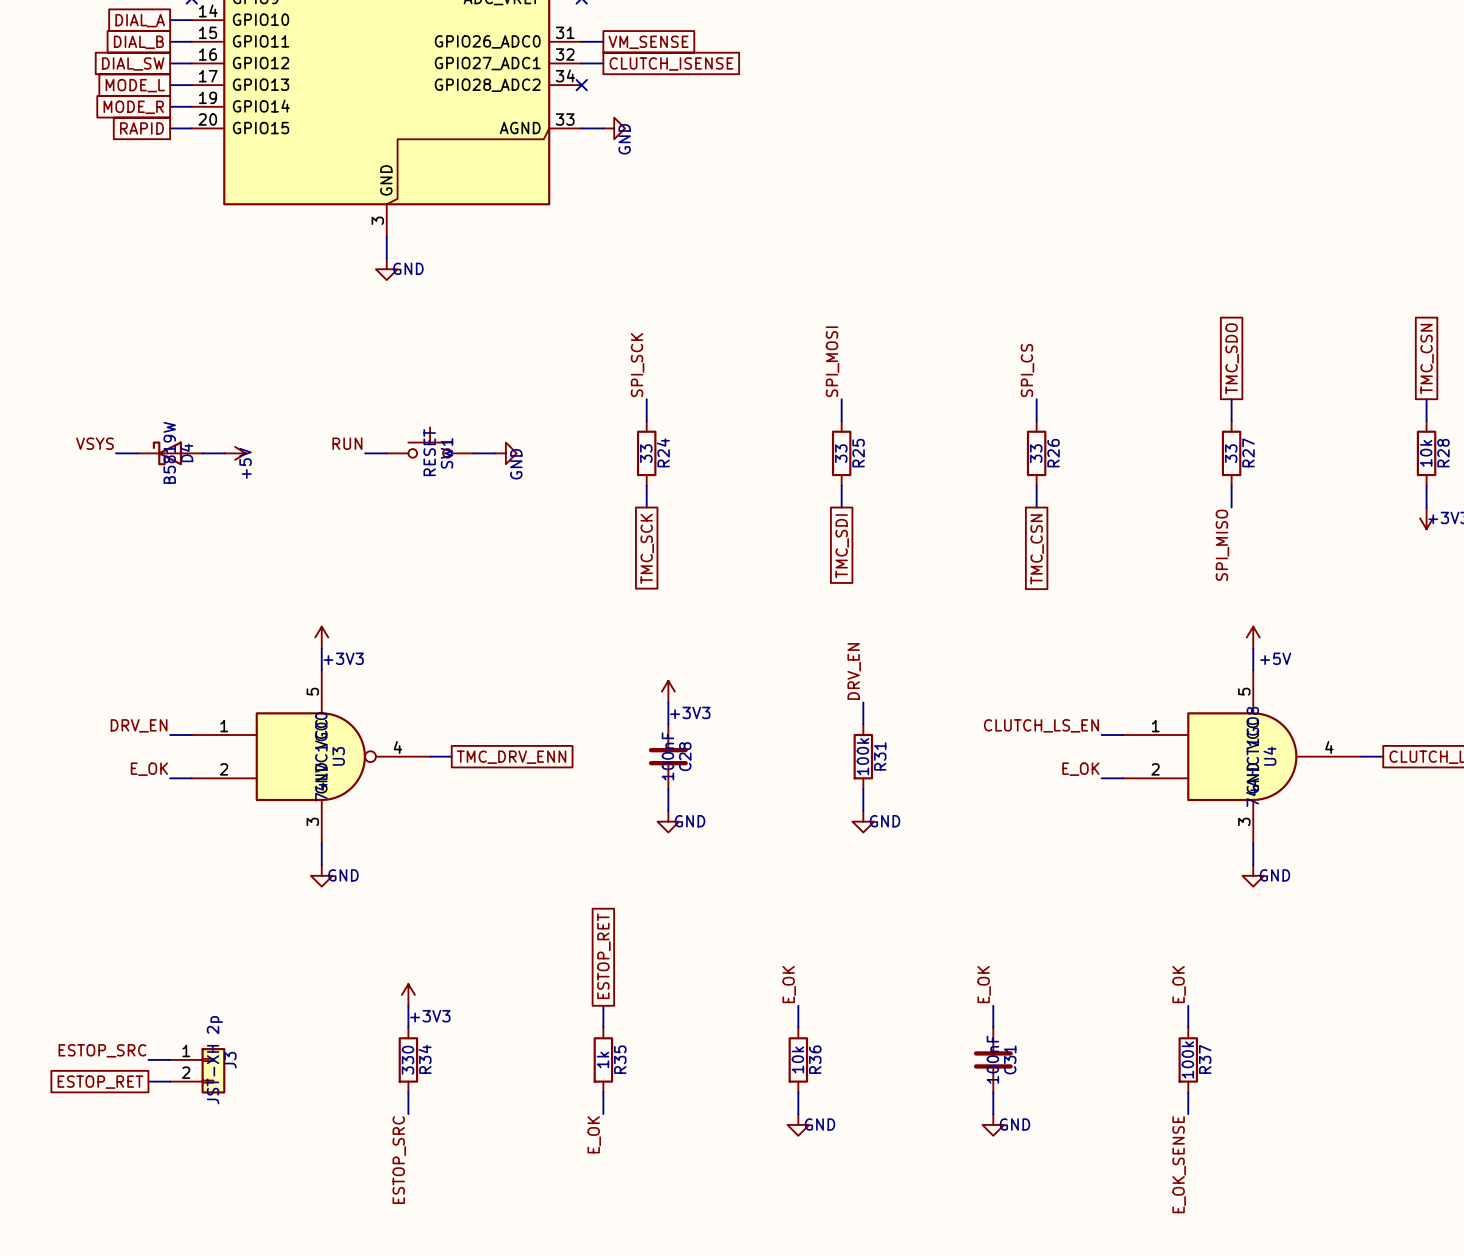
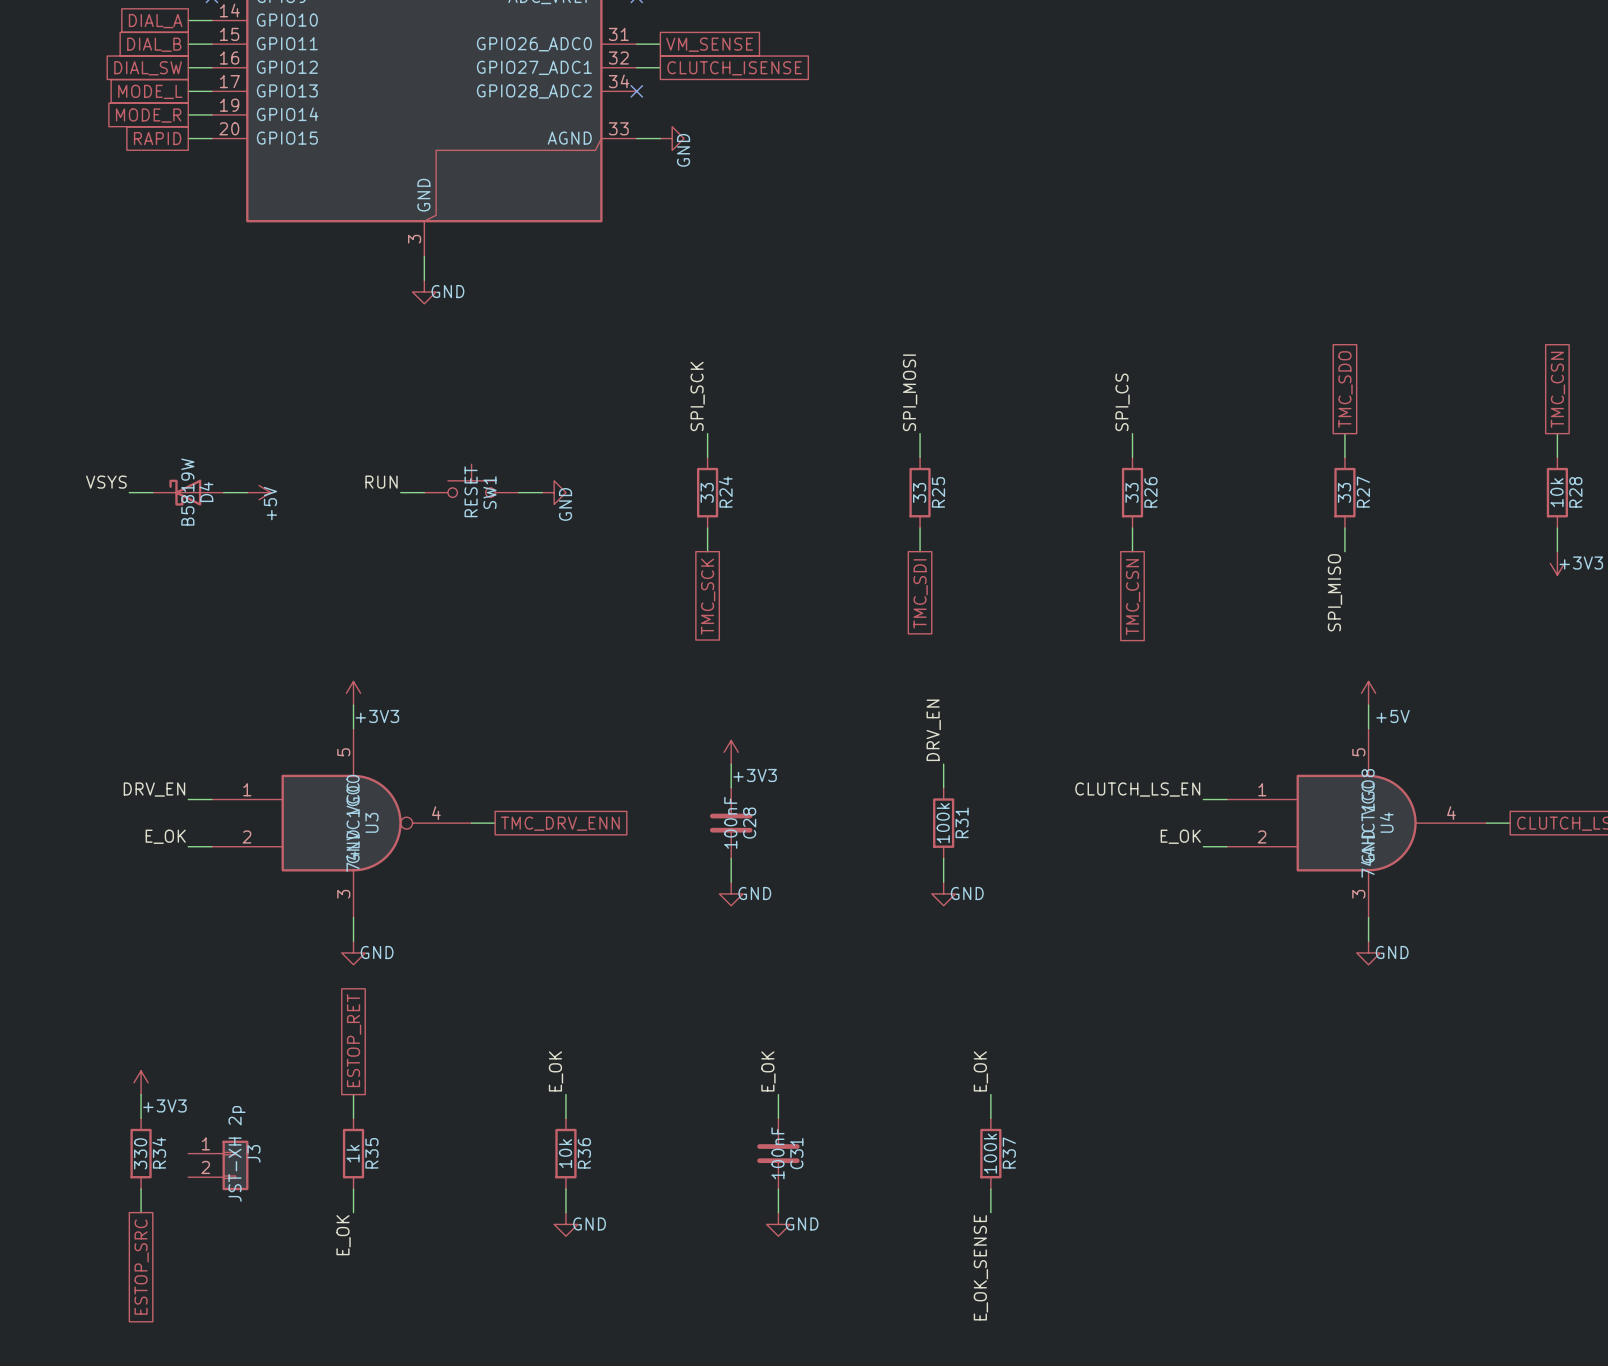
global label: none -> ESTOP_RET (354, 1040)
global label: ESTOP_RET (603, 956) -> none
label: none -> E_OK (555, 1071)
label: none -> E_OK (768, 1071)
label: E_OK (789, 984) -> none
label: none -> E_OK (980, 1071)
label: E_OK (984, 984) -> none
label: E_OK (1179, 984) -> none
power symbol: none -> +3V3 (141, 1082)
power symbol: +3V3 (408, 994) -> none
wire: none -> (141, 1094) (141, 1118)
wire: (408, 1005) (408, 1027) -> (353, 1094) (353, 1118)
wire: (603, 1005) (603, 1027) -> (565, 1094) (565, 1118)
wire: (798, 1005) (798, 1027) -> (778, 1094) (778, 1118)
wire: (993, 1005) (993, 1027) -> (990, 1094) (990, 1118)
wire: (1188, 1005) (1188, 1027) -> none
label: ESTOP_SRC (102, 1050) -> none
wire: (148, 1059) (170, 1059) -> none
R34 position: (408, 1059) -> (141, 1153)
R35 position: (603, 1059) -> (353, 1153)
R36 position: (798, 1059) -> (565, 1153)
C31 position: (993, 1059) -> (778, 1153)
R37 position: (1188, 1059) -> (990, 1153)
wire: (148, 1081) (170, 1081) -> none
global label: ESTOP_RET (100, 1082) -> none
wire: none -> (141, 1189) (141, 1212)
wire: (408, 1092) (408, 1114) -> (353, 1189) (353, 1212)
wire: (603, 1092) (603, 1114) -> (565, 1189) (565, 1212)
wire: (798, 1092) (798, 1114) -> (778, 1189) (778, 1212)
wire: (993, 1092) (993, 1114) -> (990, 1189) (990, 1212)
wire: (1188, 1092) (1188, 1114) -> none
power symbol: none -> GND (565, 1224)
power symbol position: GND (798, 1124) -> GND (778, 1224)
power symbol: GND (993, 1124) -> none
label: none -> E_OK (343, 1235)
label: E_OK (594, 1134) -> none
label: ESTOP_SRC (399, 1160) -> none
global label: none -> ESTOP_SRC (141, 1267)
label: none -> E_OK_SENSE (980, 1267)
label: E_OK_SENSE (1179, 1164) -> none

